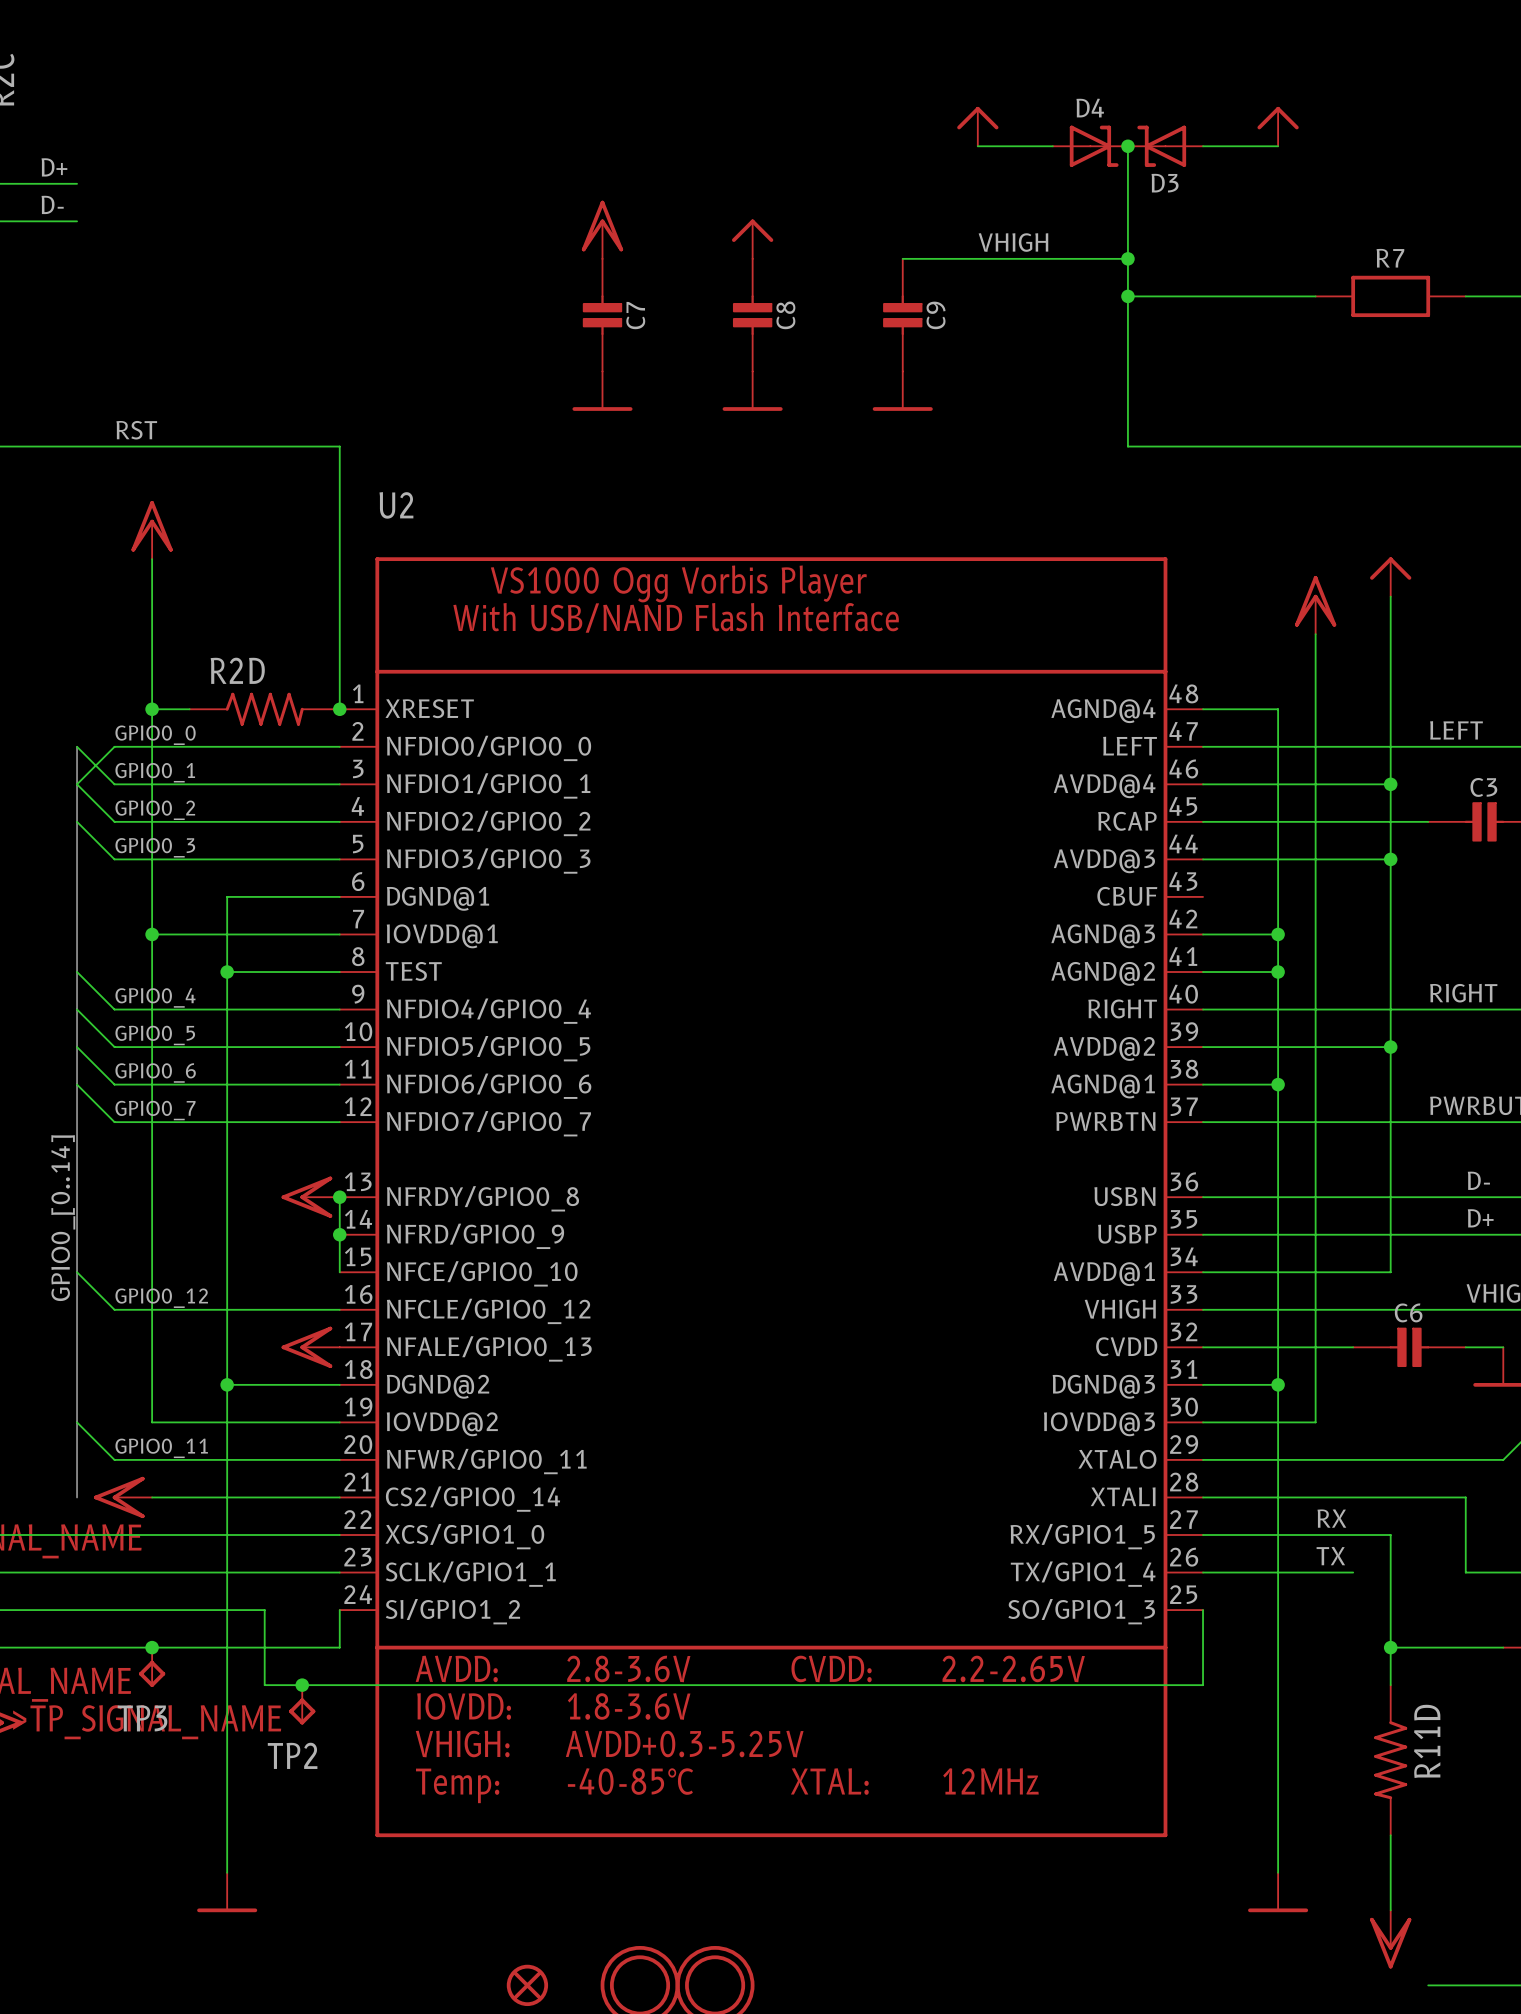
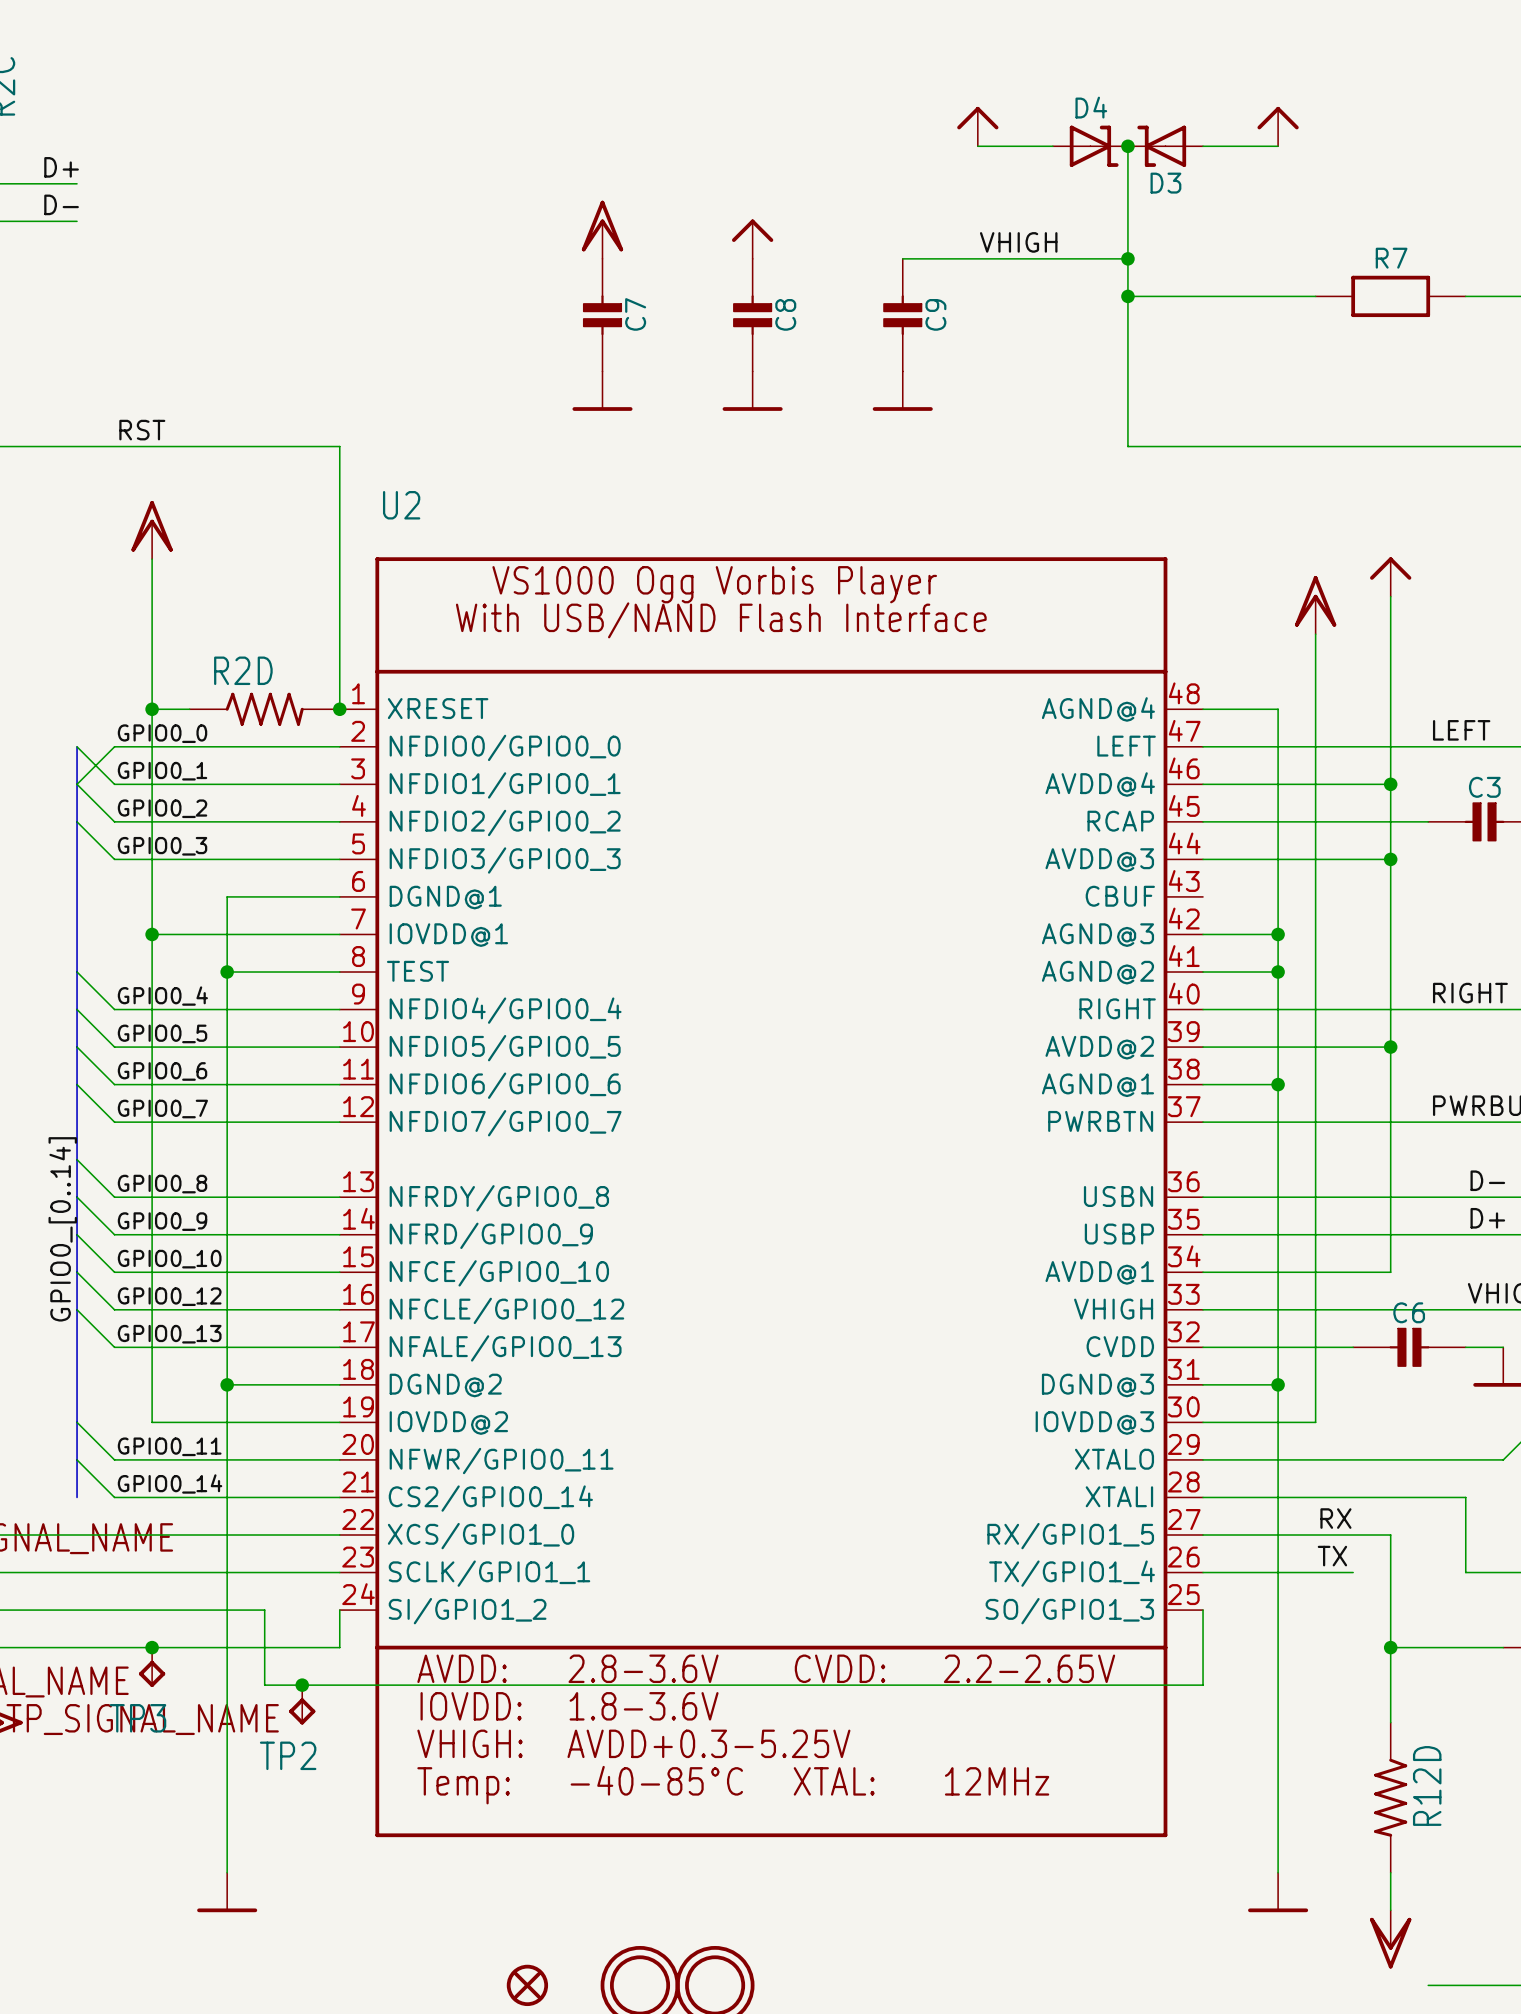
wire: none -> (77, 1159) (114, 1197) (339, 1197)
label: none -> GPIO0_8 (162, 1184)
wire: none -> (77, 1197) (114, 1234) (339, 1234)
power symbol: (310, 1197) -> none
wire: (339, 1197) (339, 1272) -> (77, 1234) (114, 1272) (339, 1272)
junction: (339, 1197) -> none
label: none -> GPIO0_9 (162, 1221)
junction: (339, 1234) -> none
label: none -> GPIO0_10 (169, 1259)
wire: none -> (77, 1309) (114, 1347) (339, 1347)
label: none -> GPIO0_13 (169, 1334)
power symbol: (310, 1347) -> none
wire: none -> (77, 1459) (114, 1497) (152, 1497)
label: none -> GPIO0_14 (170, 1483)
power symbol: (123, 1497) -> none
R11D: (1390, 1760) -> none
R12D: none -> (1390, 1797)

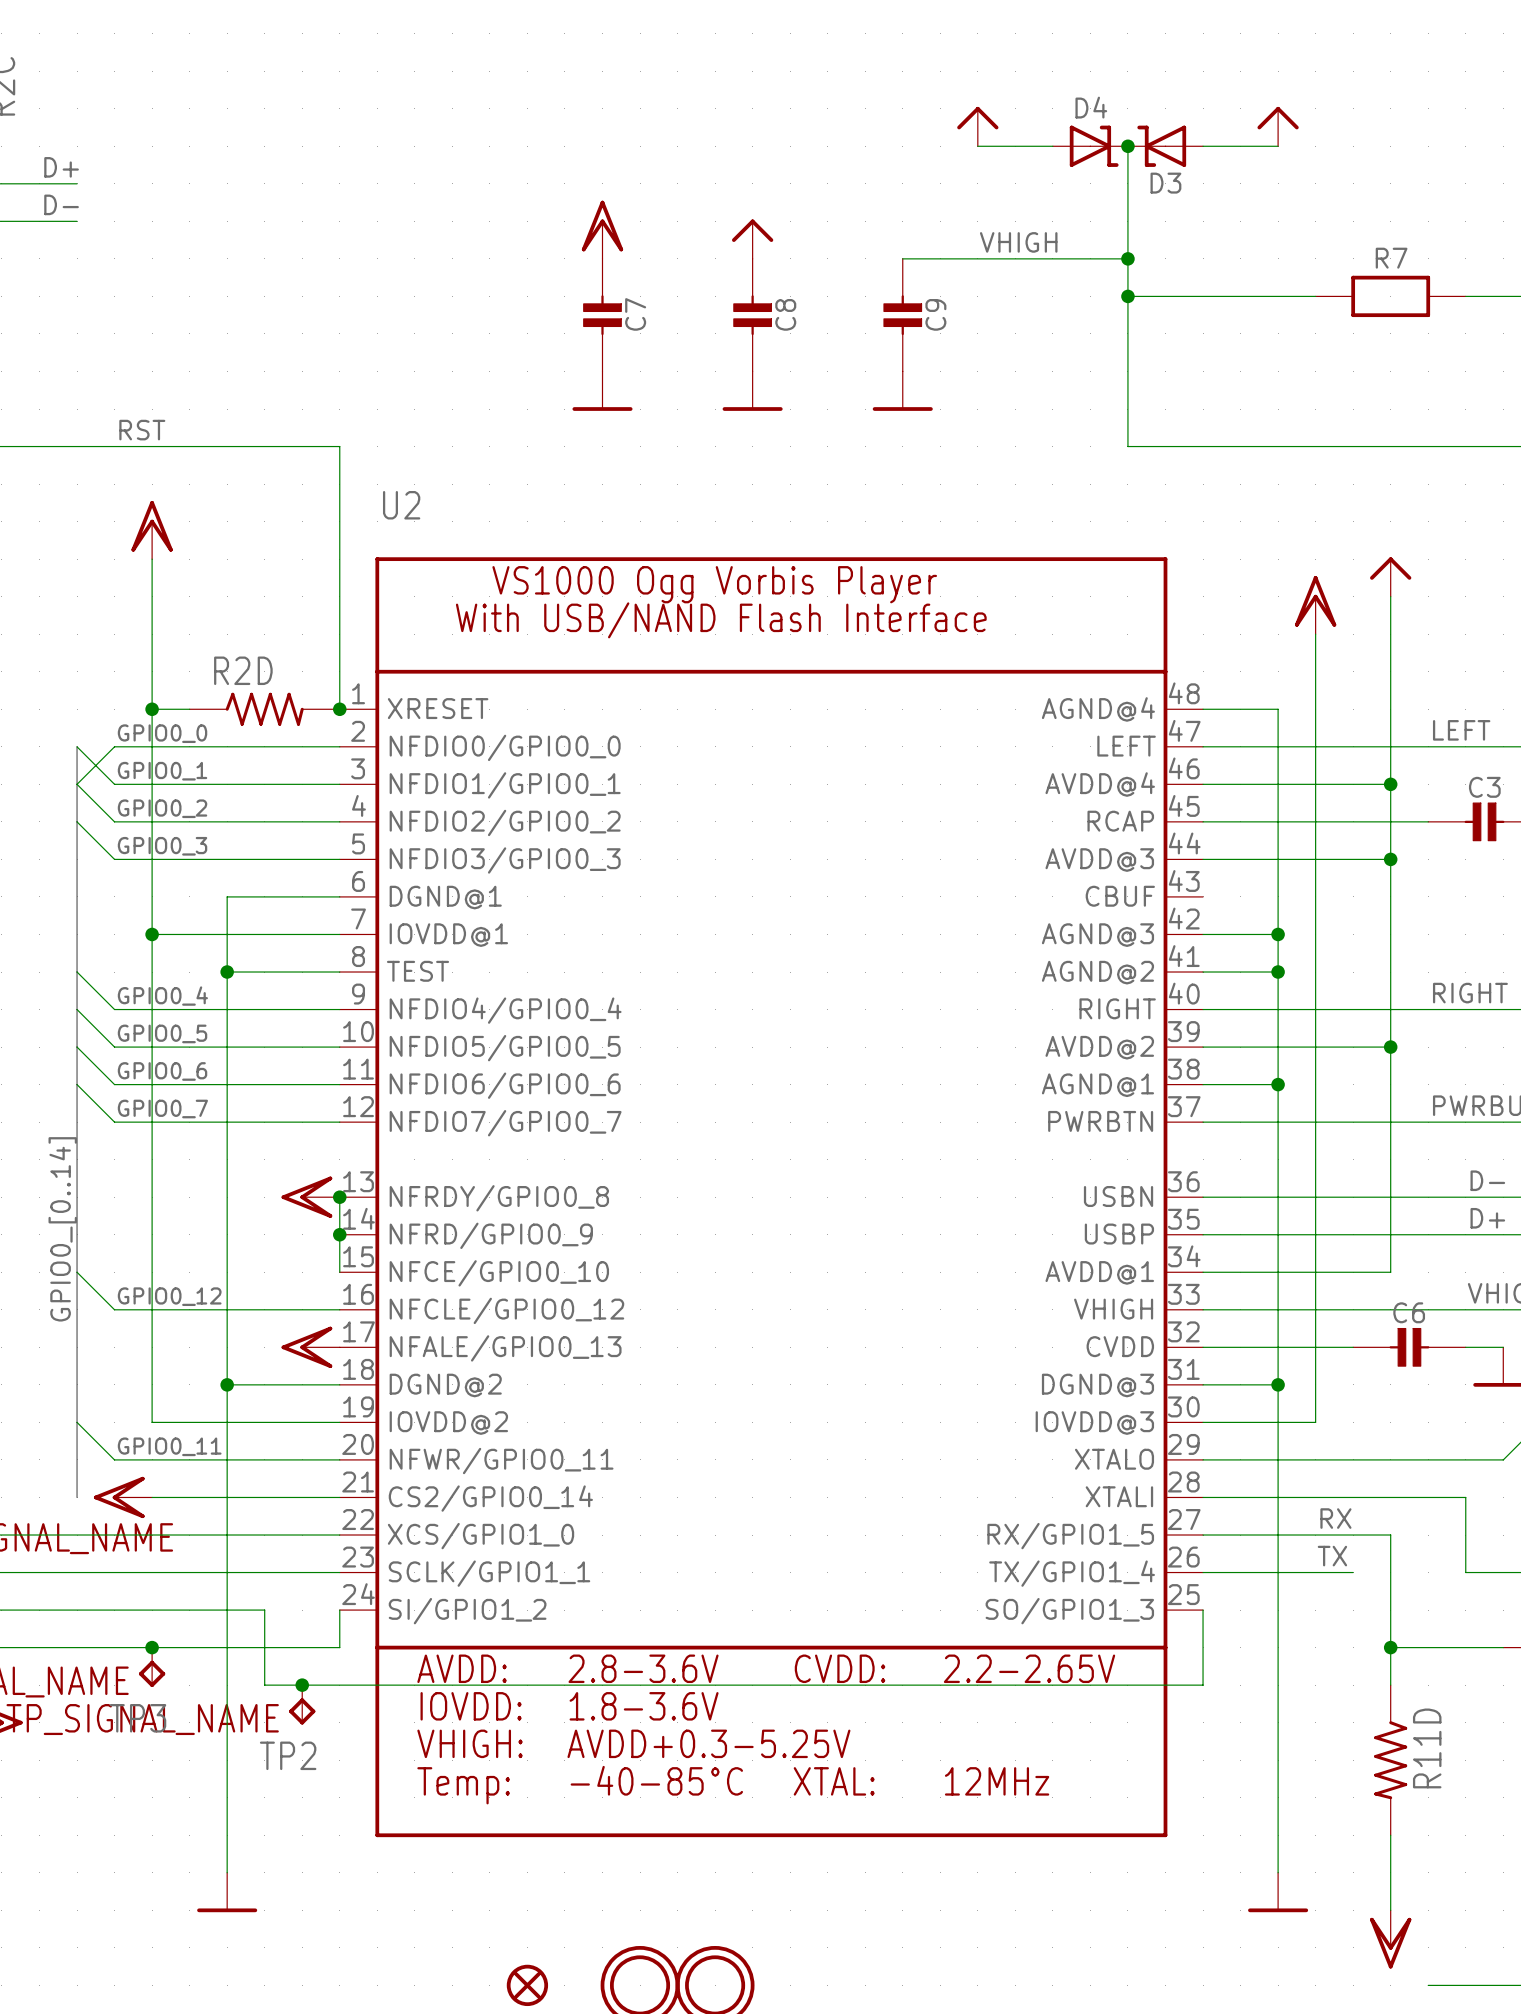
wire: (77, 1159) (114, 1197) (339, 1197) -> none
label: GPIO0_8 (162, 1184) -> none
wire: (77, 1197) (114, 1234) (339, 1234) -> none
power symbol: none -> (310, 1197)
junction: none -> (339, 1197)
label: GPIO0_9 (162, 1221) -> none
wire: (77, 1234) (114, 1272) (339, 1272) -> (339, 1197) (339, 1272)
junction: none -> (339, 1234)
label: GPIO0_10 (169, 1259) -> none
wire: (77, 1309) (114, 1347) (339, 1347) -> none
label: GPIO0_13 (169, 1334) -> none
power symbol: none -> (310, 1347)
wire: (77, 1459) (114, 1497) (152, 1497) -> none
label: GPIO0_14 (170, 1483) -> none
power symbol: none -> (123, 1497)
R11D: none -> (1390, 1760)
R12D: (1390, 1797) -> none

